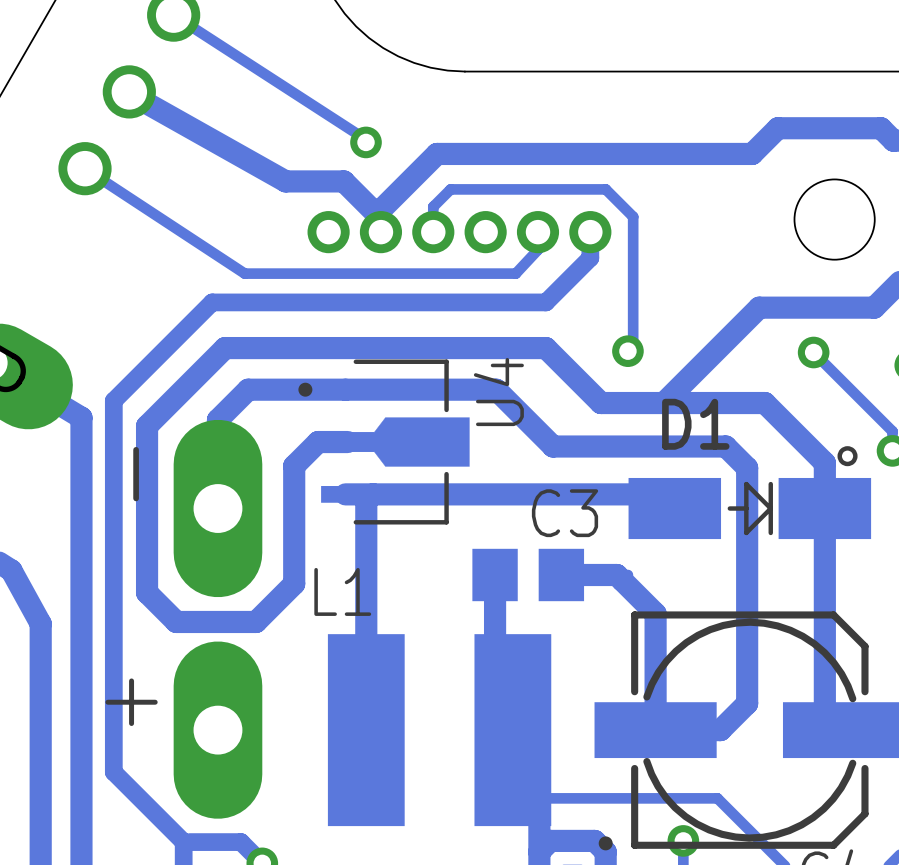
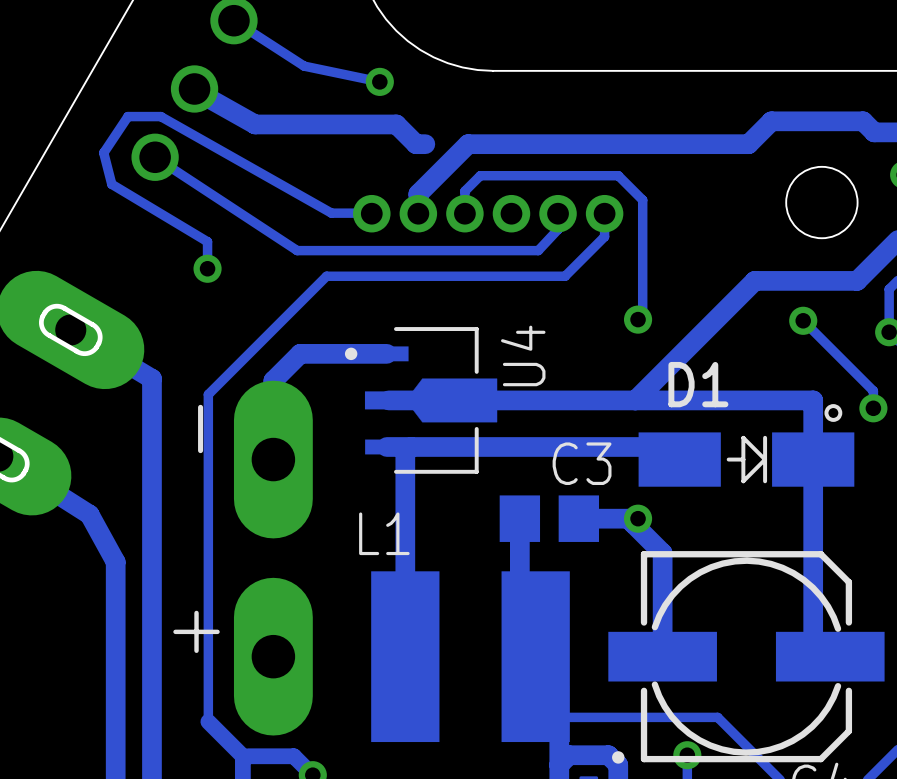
track: (252, 66) (362, 137) (366, 142) -> (304, 66) (379, 81)
track: (197, 131) (285, 181) (343, 181) (380, 218) -> (255, 124) (396, 124) (416, 144) (425, 144)
via position: (366, 142) -> (379, 81)
track: none -> (371, 213) (331, 213) (160, 116) (127, 116) (103, 152) (111, 184) (207, 241) (207, 268)
track width: thick (590, 232) (590, 258) (545, 302) (277, 302) -> thin (604, 213) (604, 236) (565, 276) (326, 276)
via: none -> (207, 268)
track: (277, 302) (212, 302) (113, 400) (113, 772) (144, 803) -> (326, 276) (208, 394) (208, 721)
track: (345, 389) (496, 389) (553, 446) (725, 446) (747, 467) (747, 703) (720, 730) (655, 730) -> none
track: none -> (669, 365) (635, 400)
track: (347, 442) (318, 442) (294, 465) (294, 583) (256, 621) (176, 621) (147, 592) (147, 426) (225, 348) (545, 348) (600, 403) (764, 403) (824, 462) -> (388, 400) (813, 400) (813, 419)
via: none -> (638, 518)

